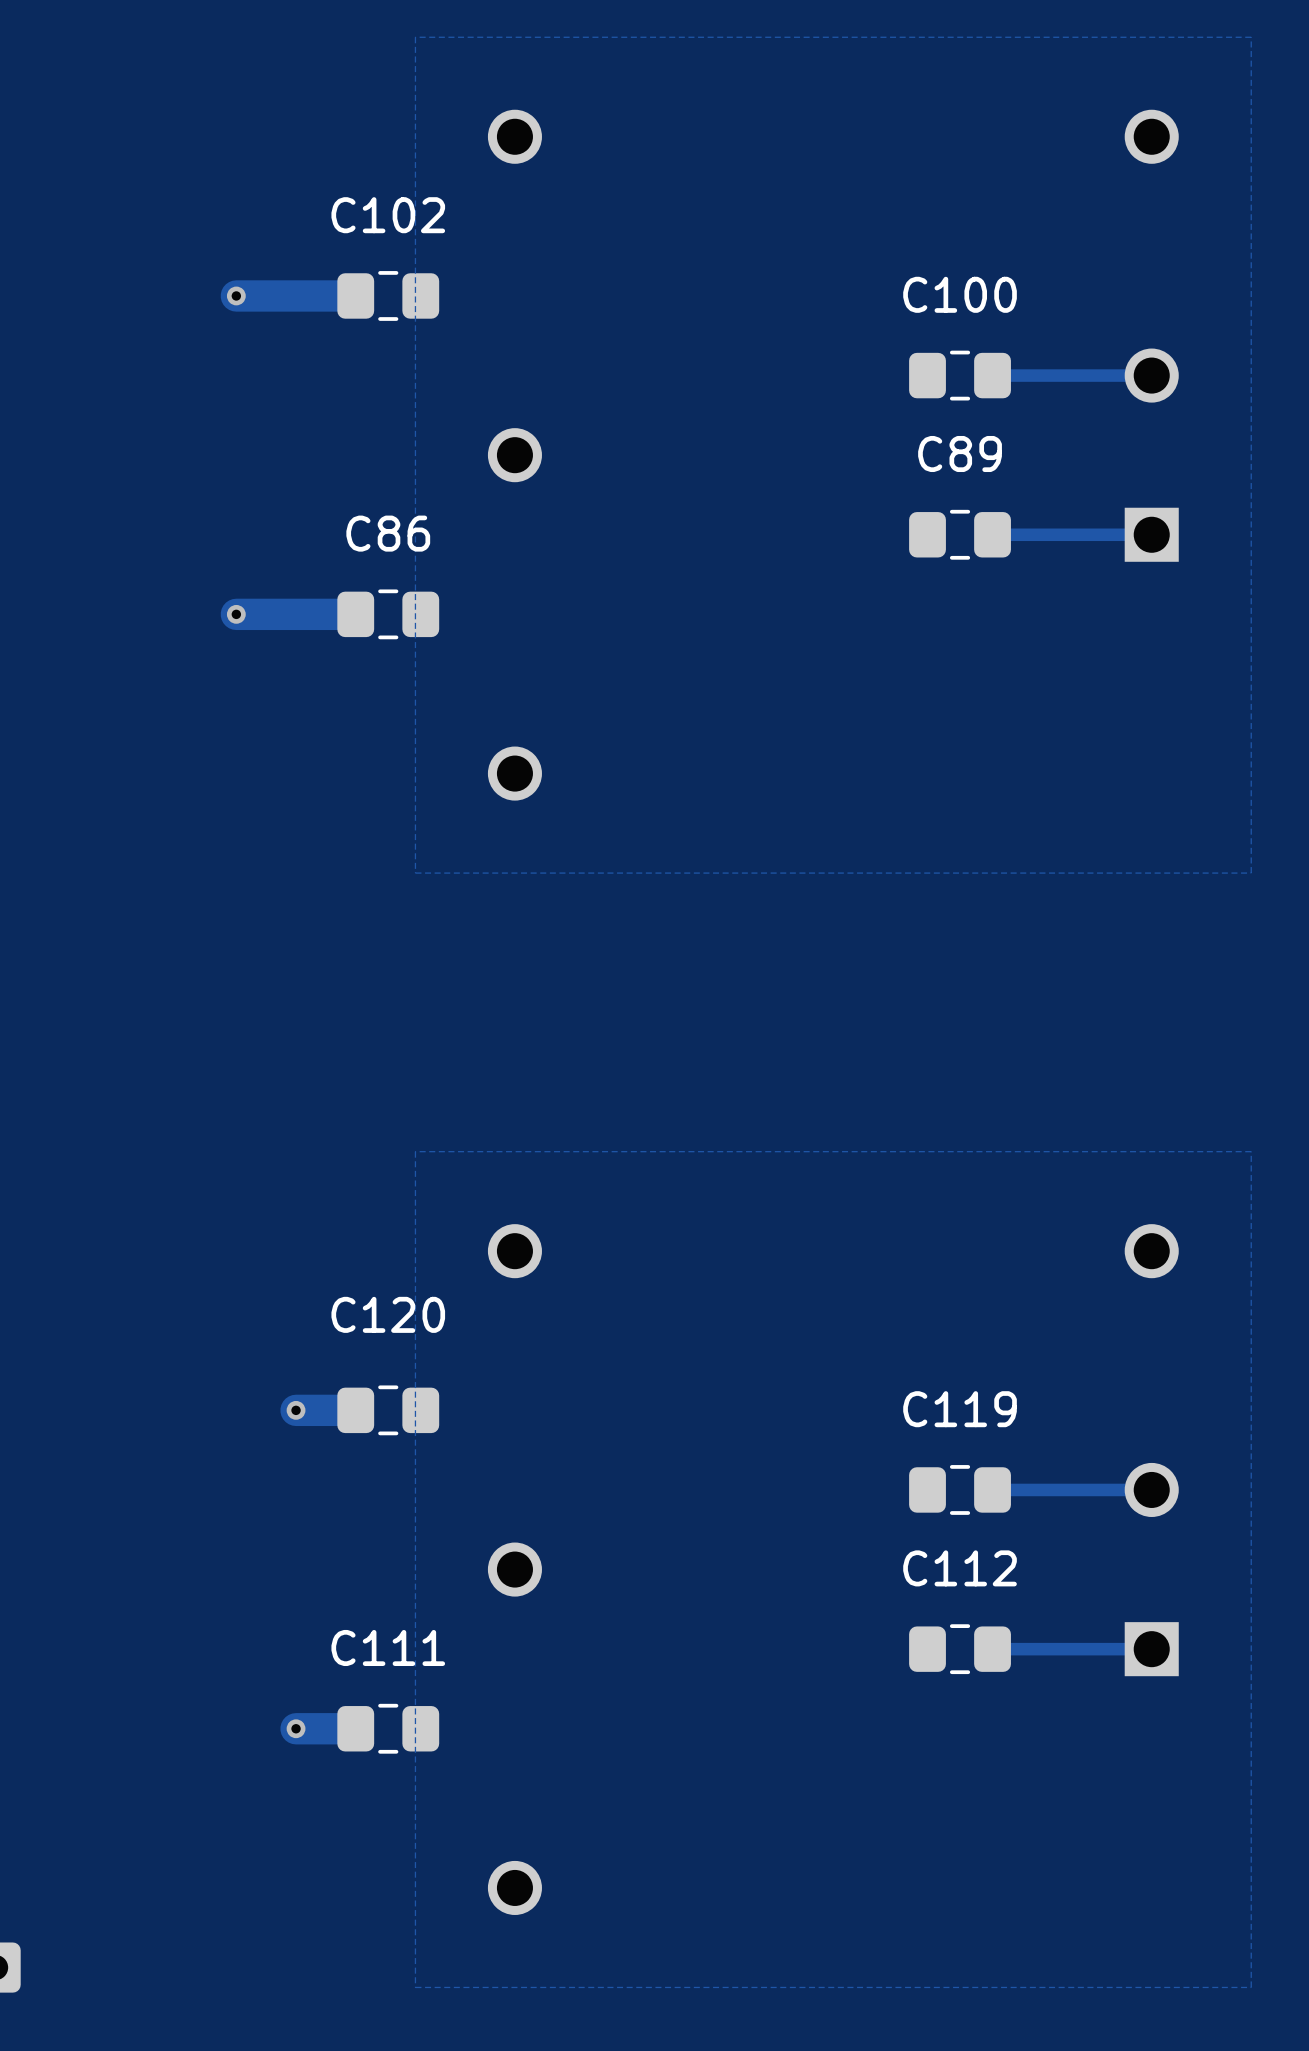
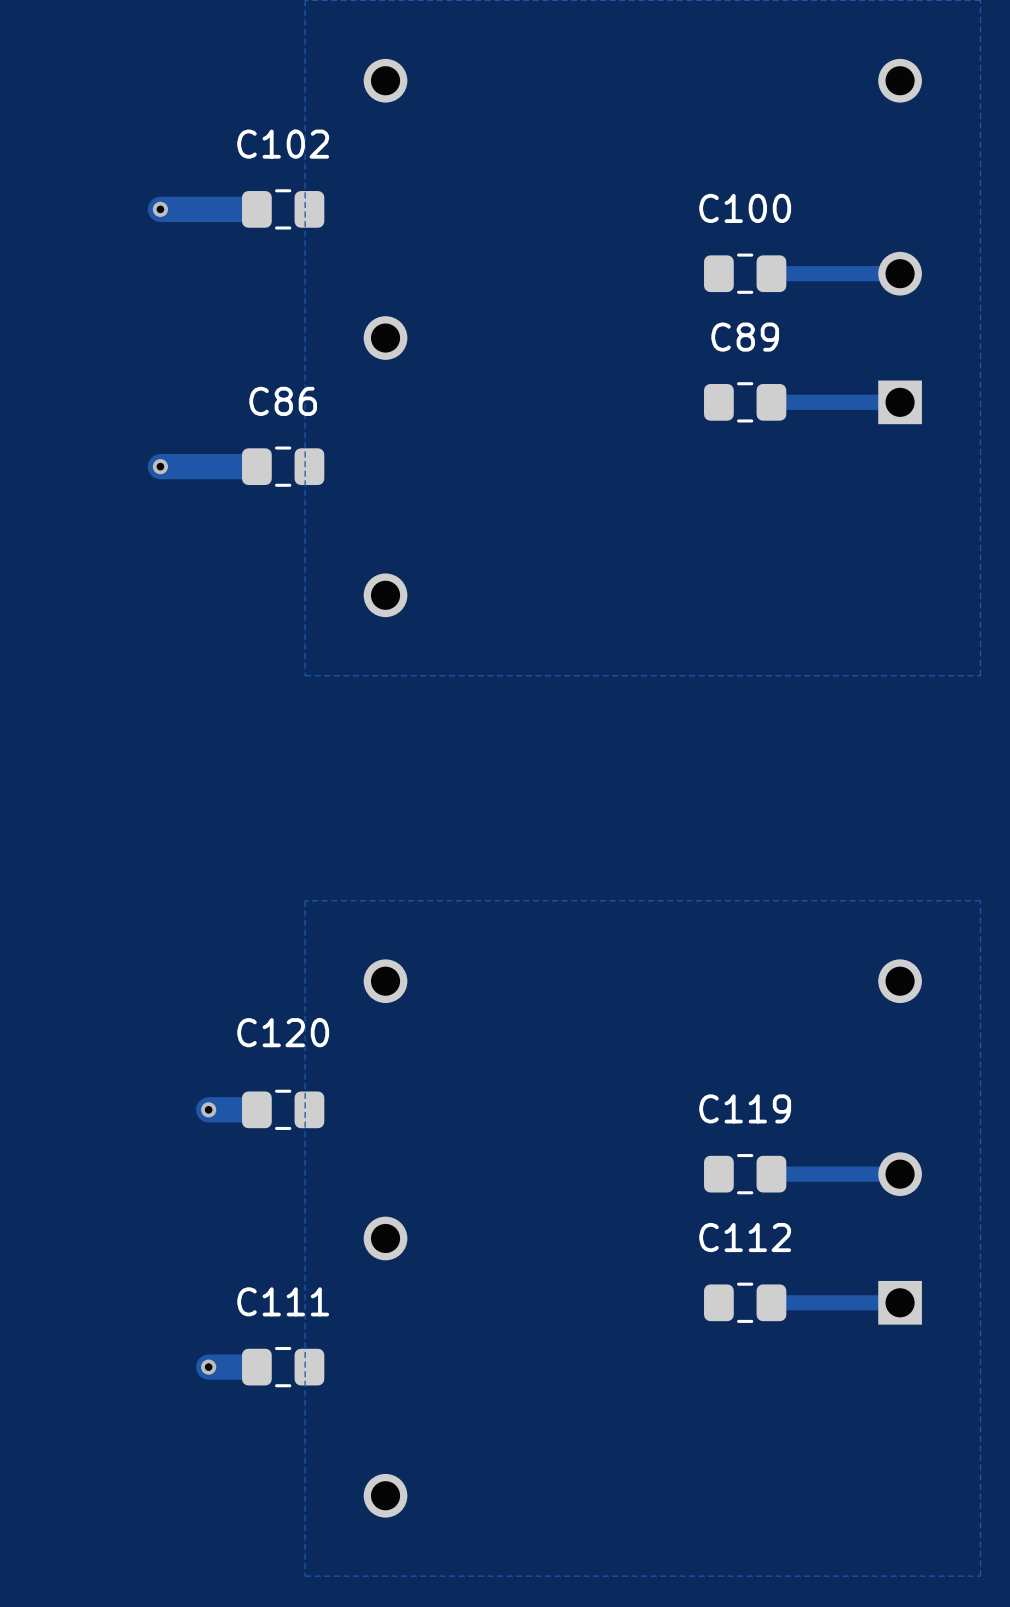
track width: thin (1151, 375) (992, 375) -> thick (900, 273) (771, 273)
track width: thin (1151, 534) (992, 534) -> thick (900, 402) (771, 402)
track width: thin (1151, 1489) (992, 1489) -> thick (900, 1174) (771, 1174)
track width: thin (1151, 1649) (992, 1649) -> thick (900, 1302) (771, 1302)

